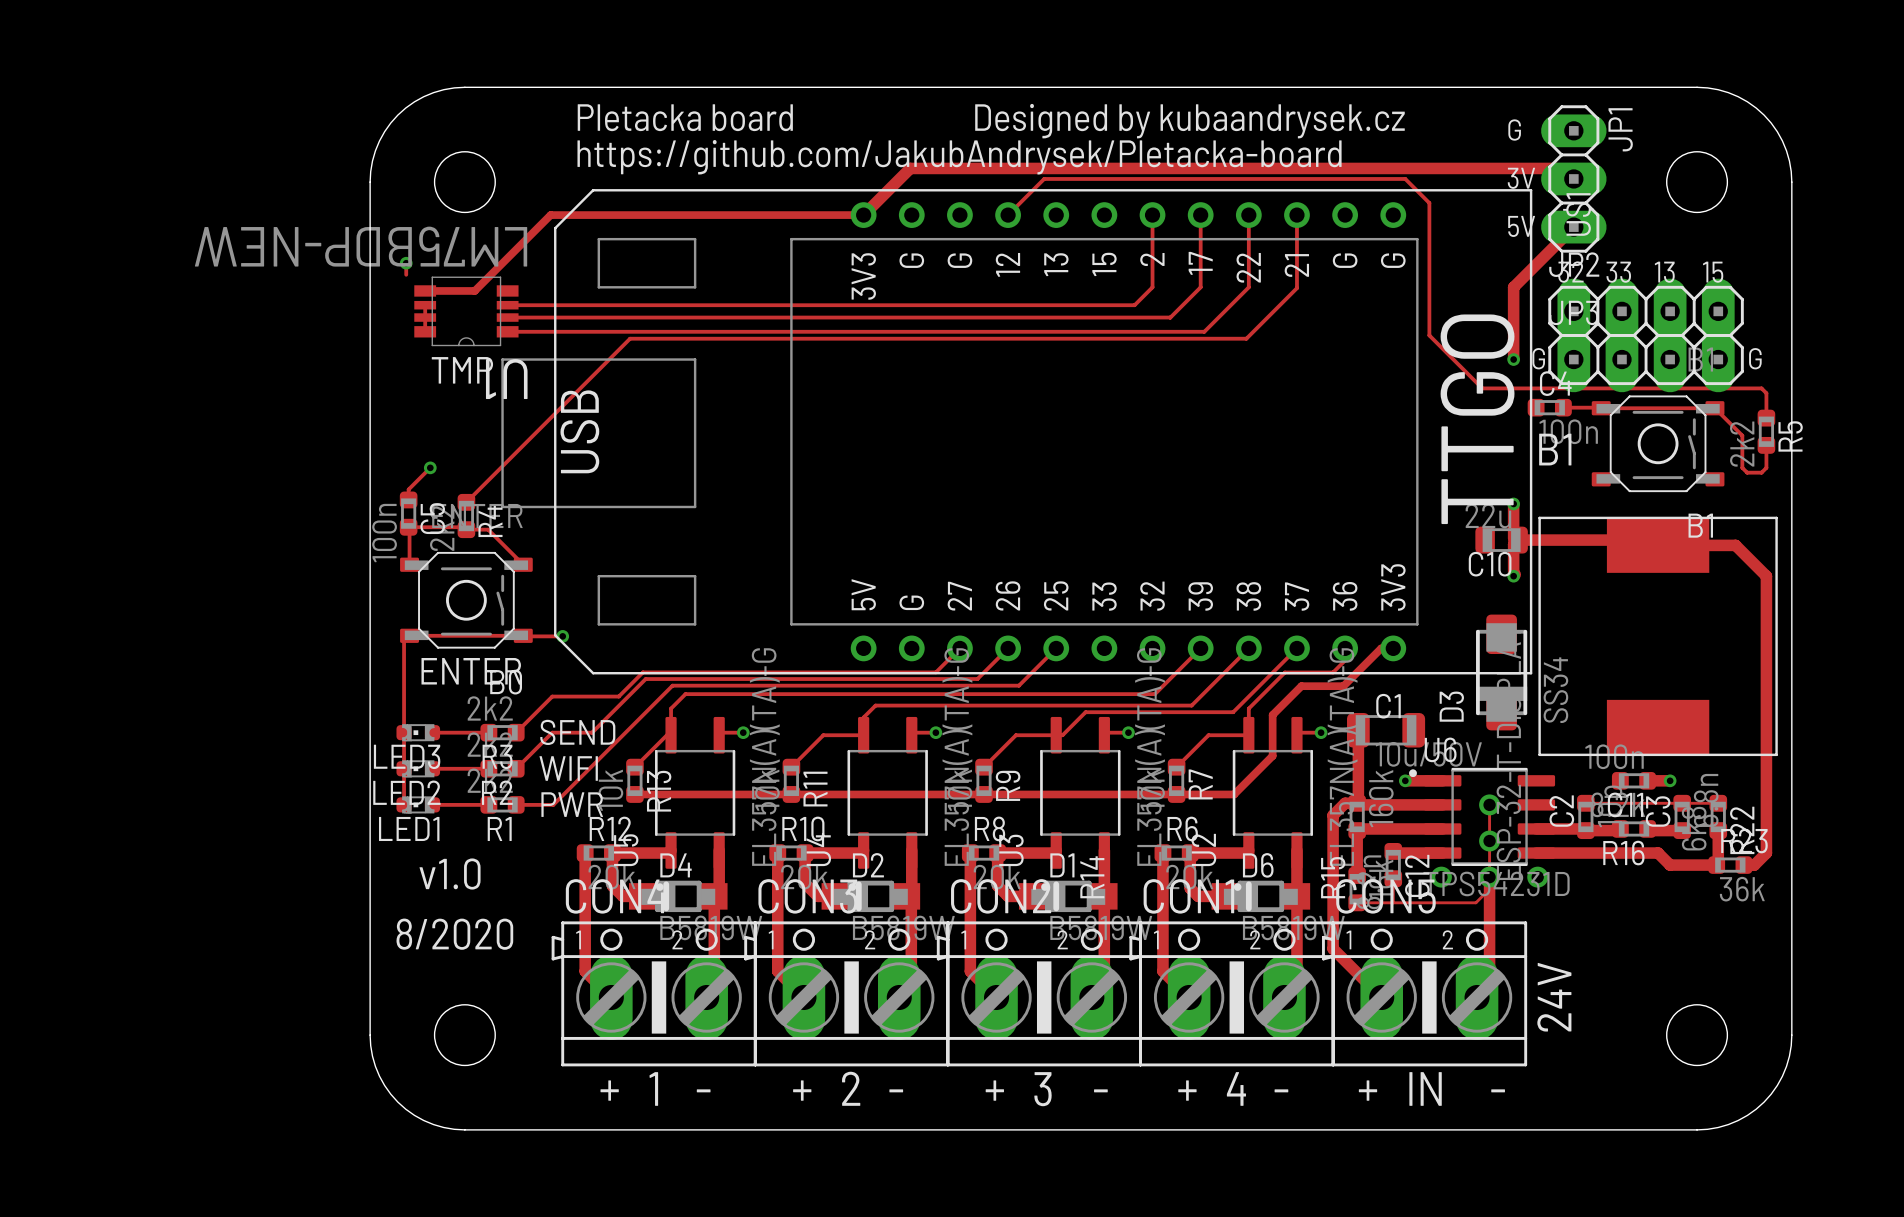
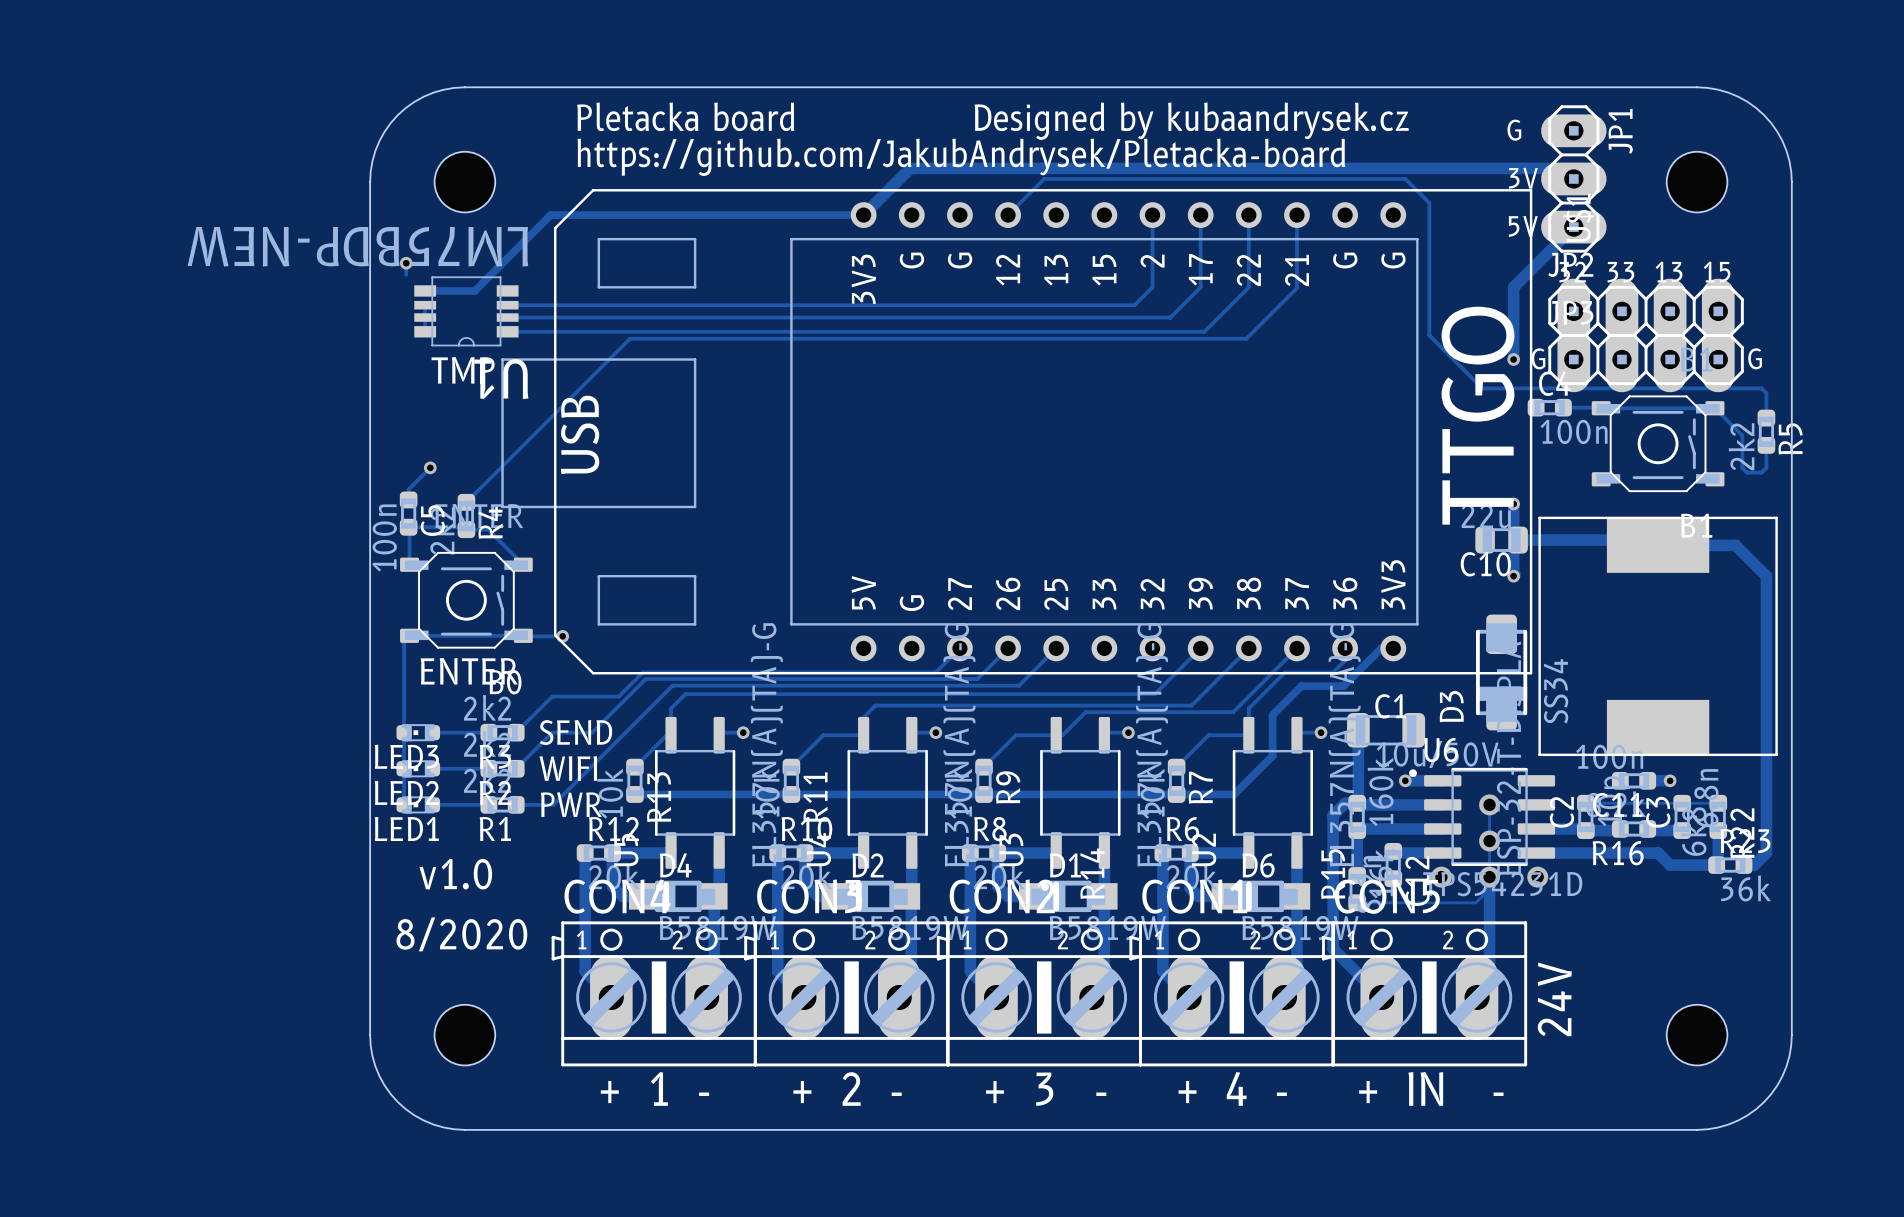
text: B1 (1555, 449) -> none

